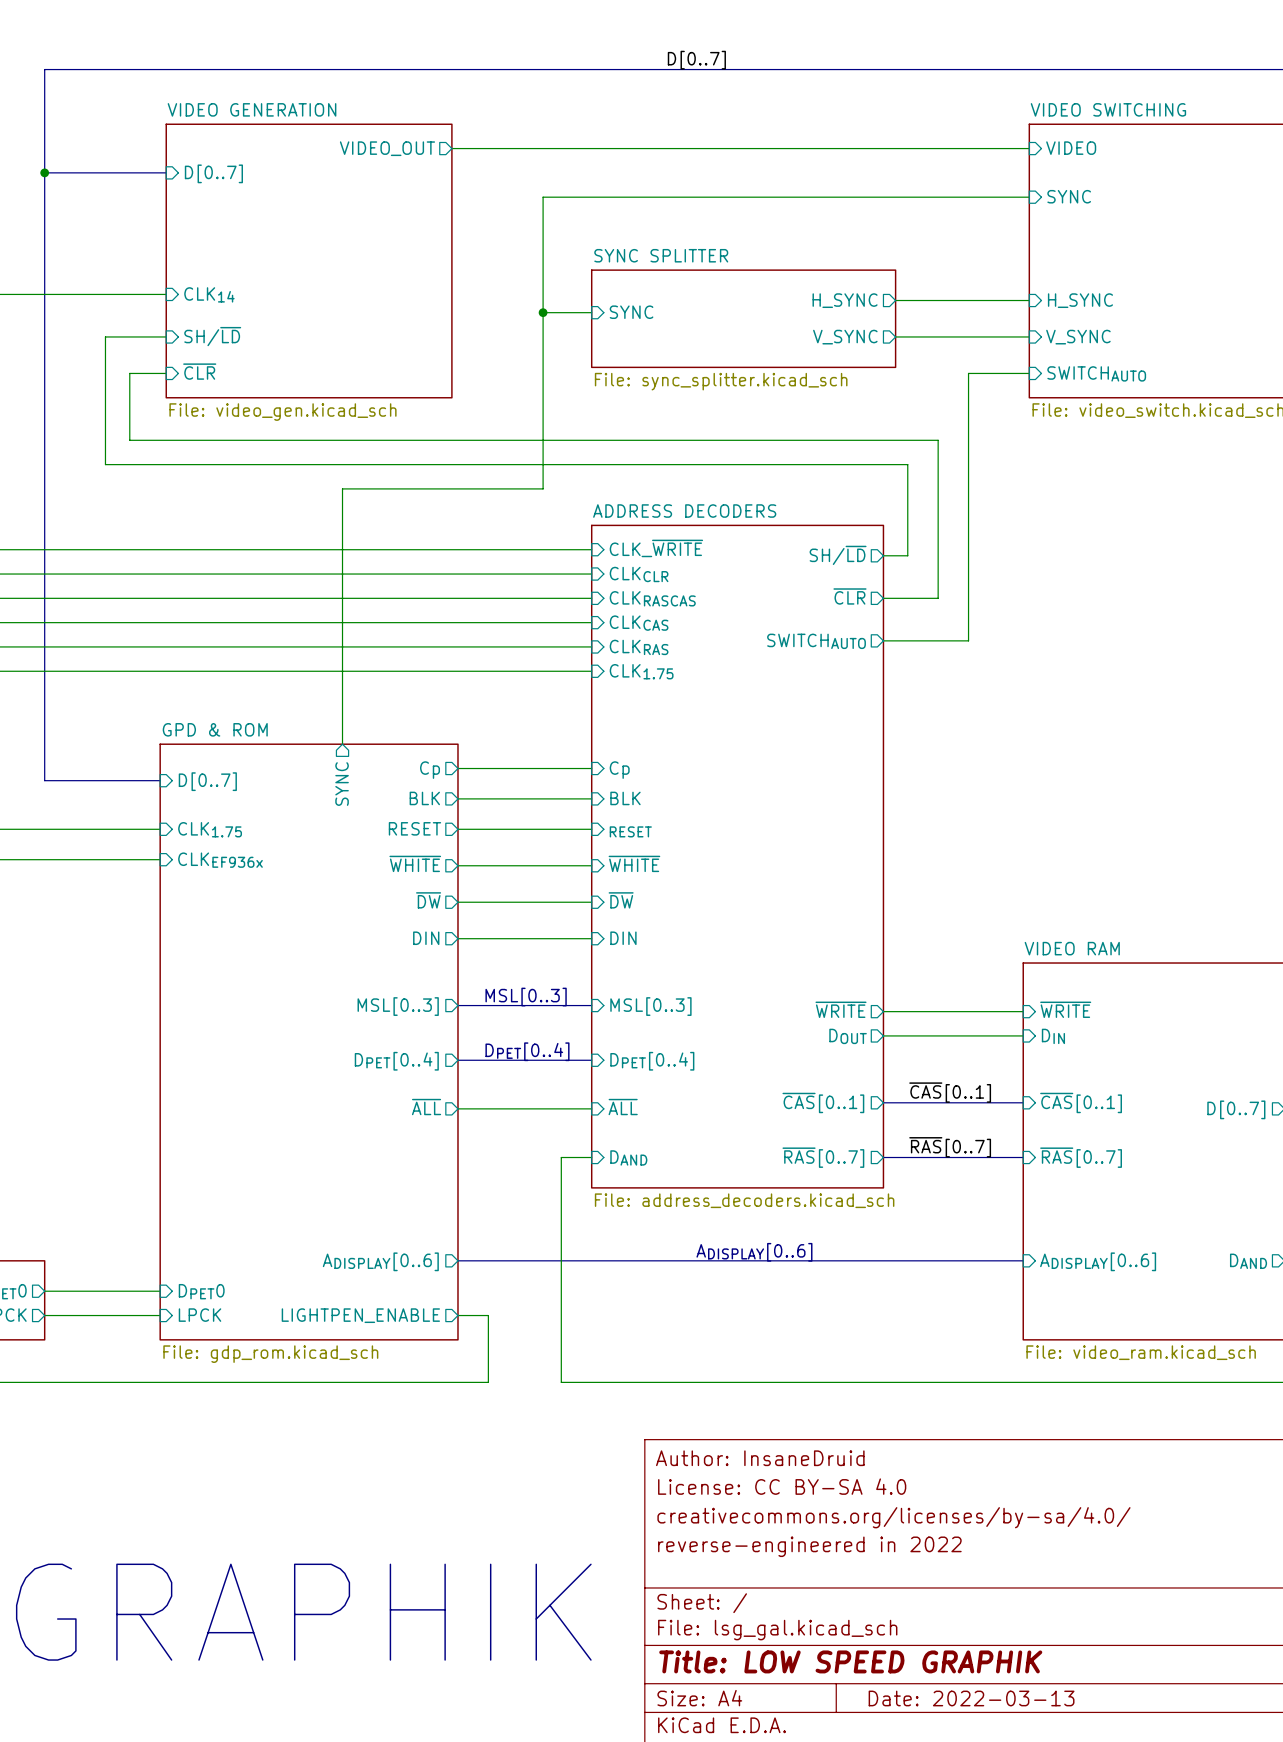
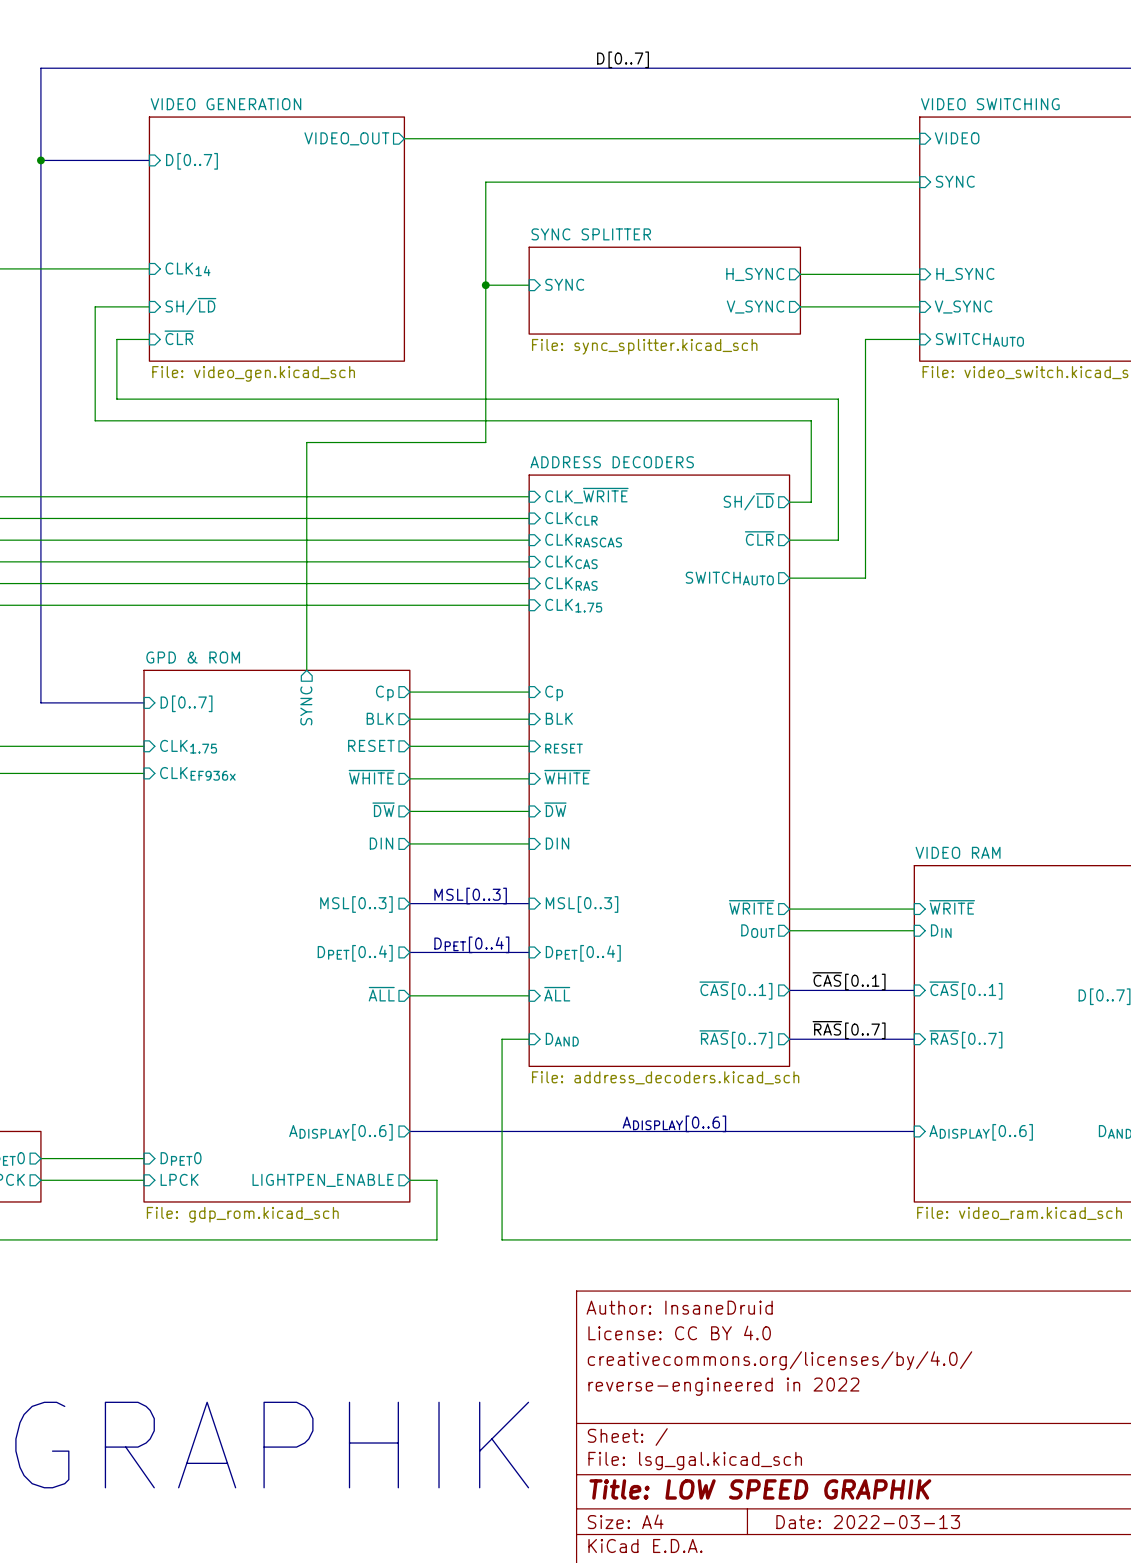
title block: License: CC BY-SA 4.0 (782, 1486) -> License: CC BY 4.0 (679, 1332)
title block: creativecommons.org/licenses/by-sa/4.0/ (893, 1517) -> creativecommons.org/licenses/by/4.0/ (780, 1360)

